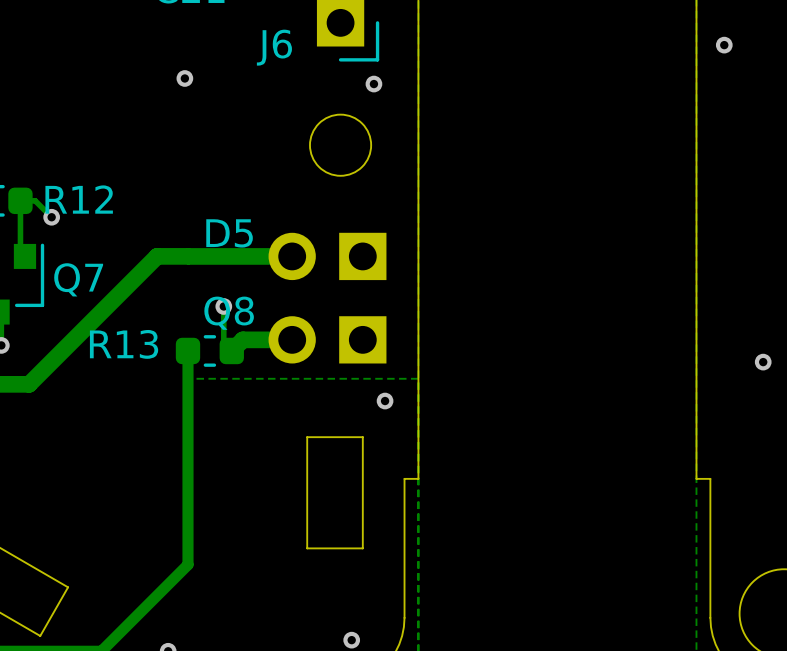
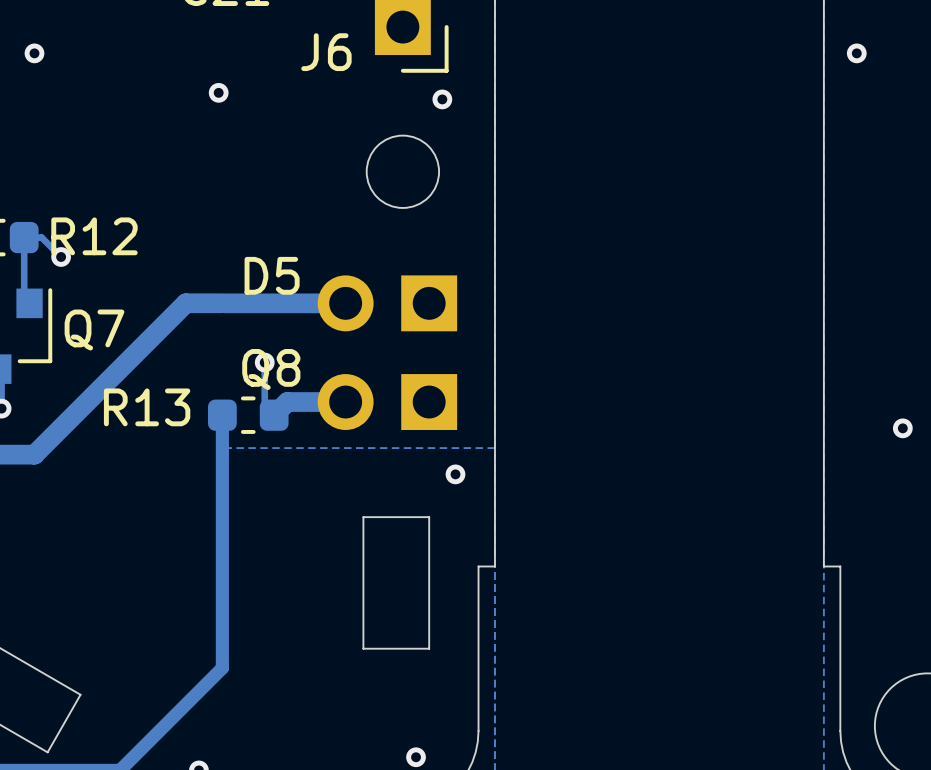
via: none -> (34, 53)

